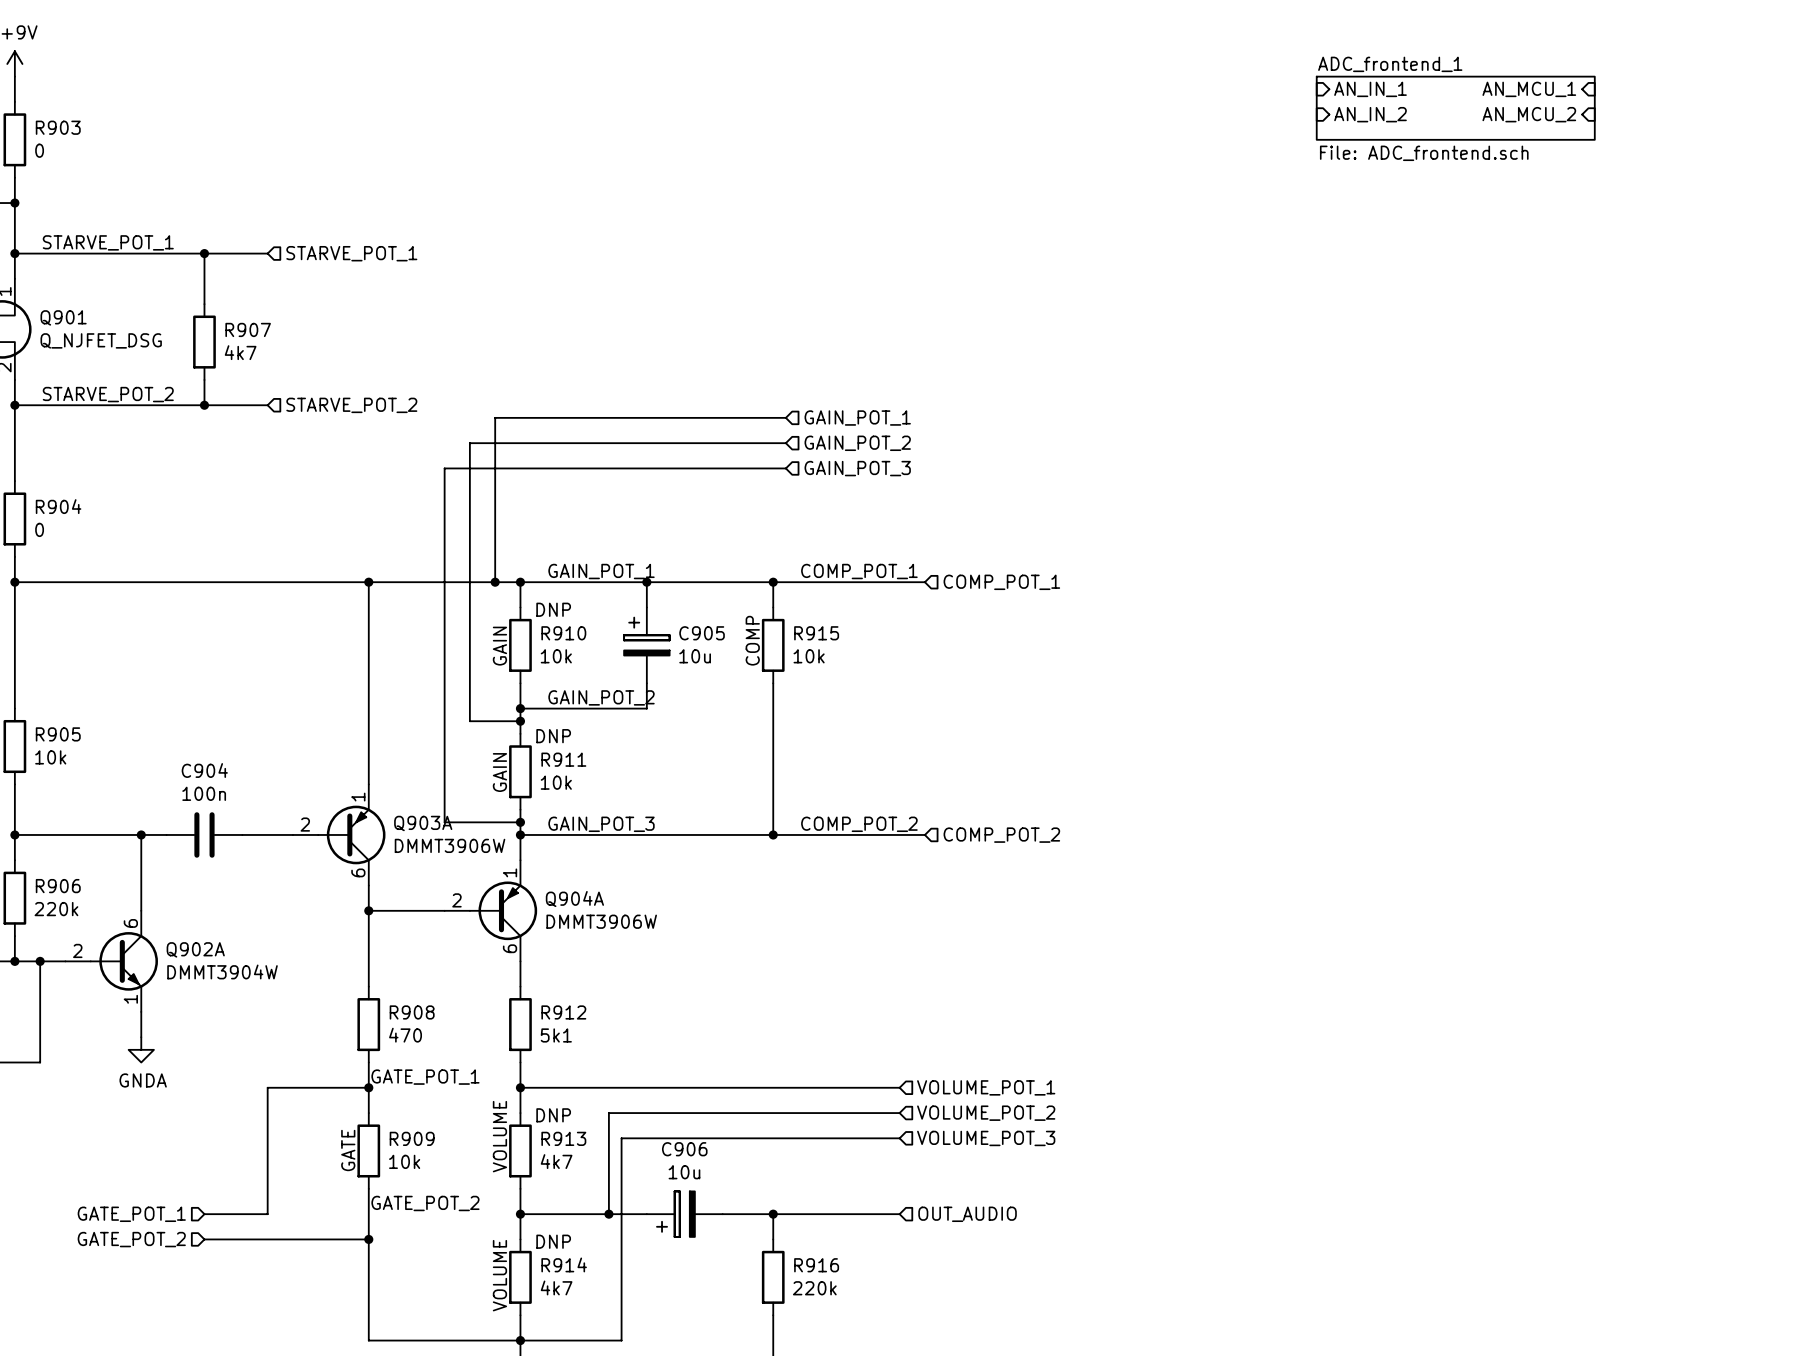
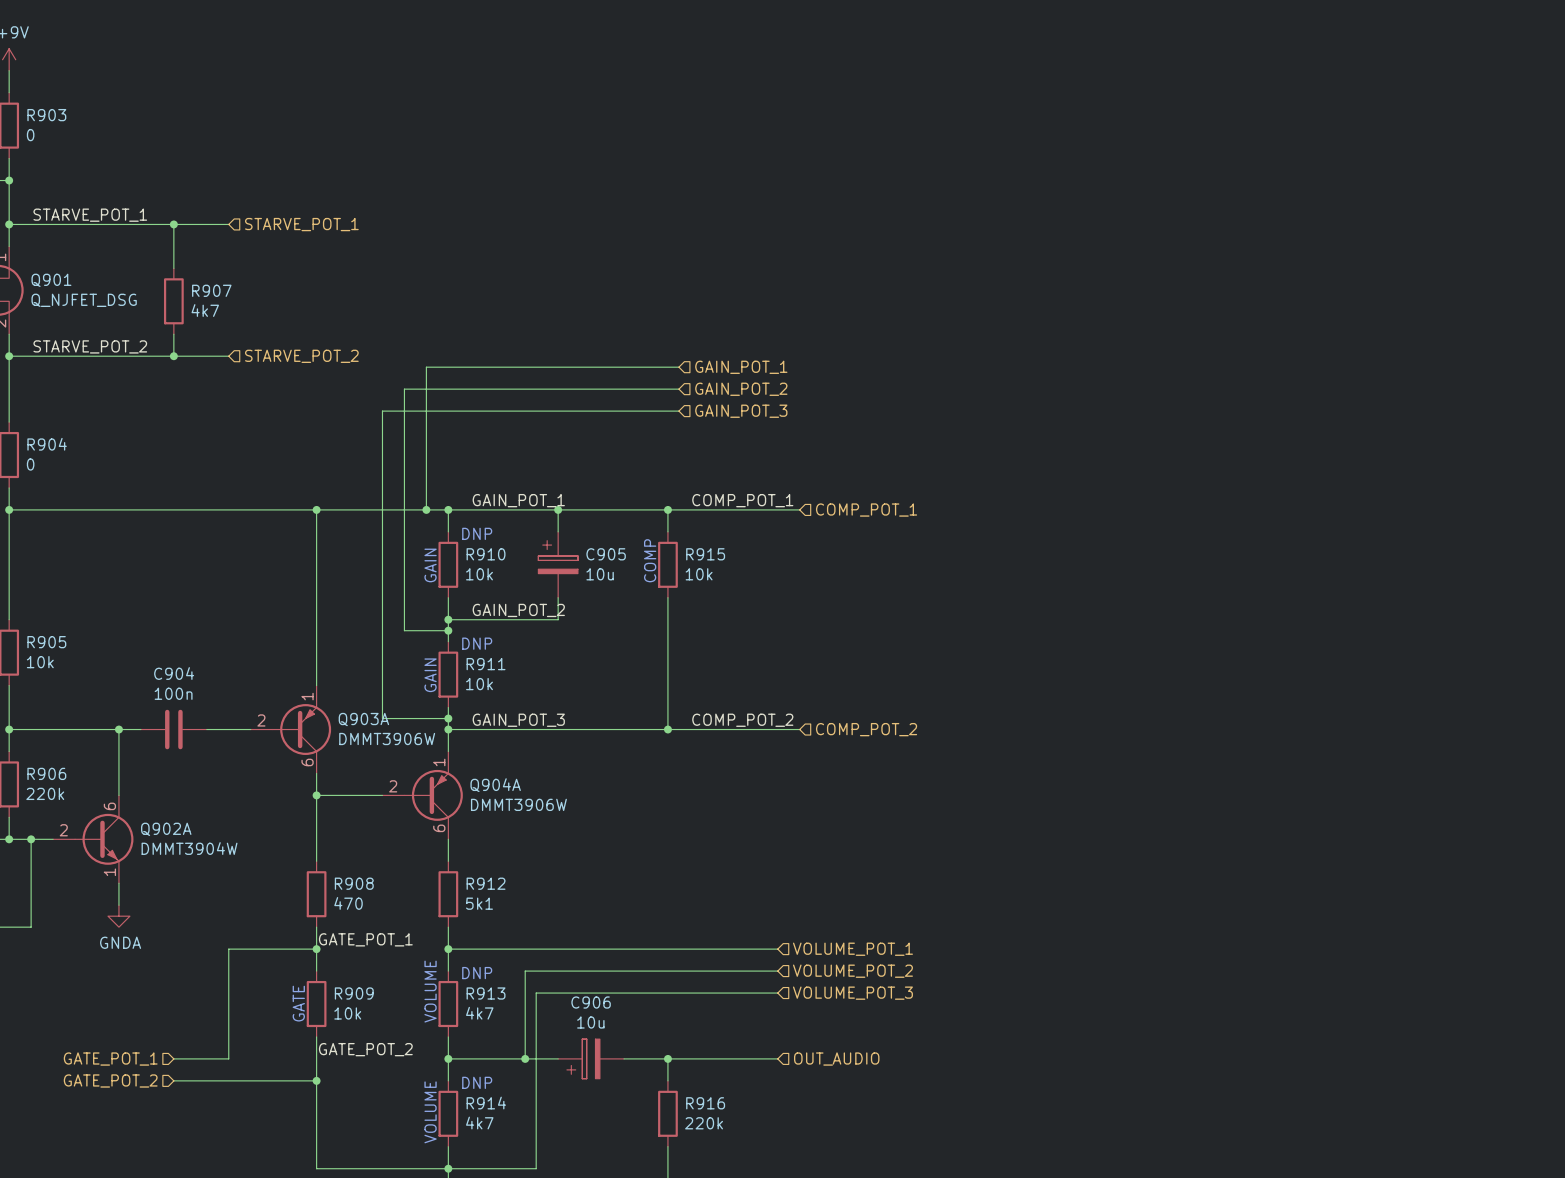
sheet pin: AN_IN_1 (1370, 89) -> none
sheet pin: AN_MCU_1 (1529, 89) -> none
sheet ADC_frontend_1: File: ADC_frontend.sch (1455, 108) -> none
sheet pin: AN_IN_2 (1370, 114) -> none
sheet pin: AN_MCU_2 (1529, 114) -> none

